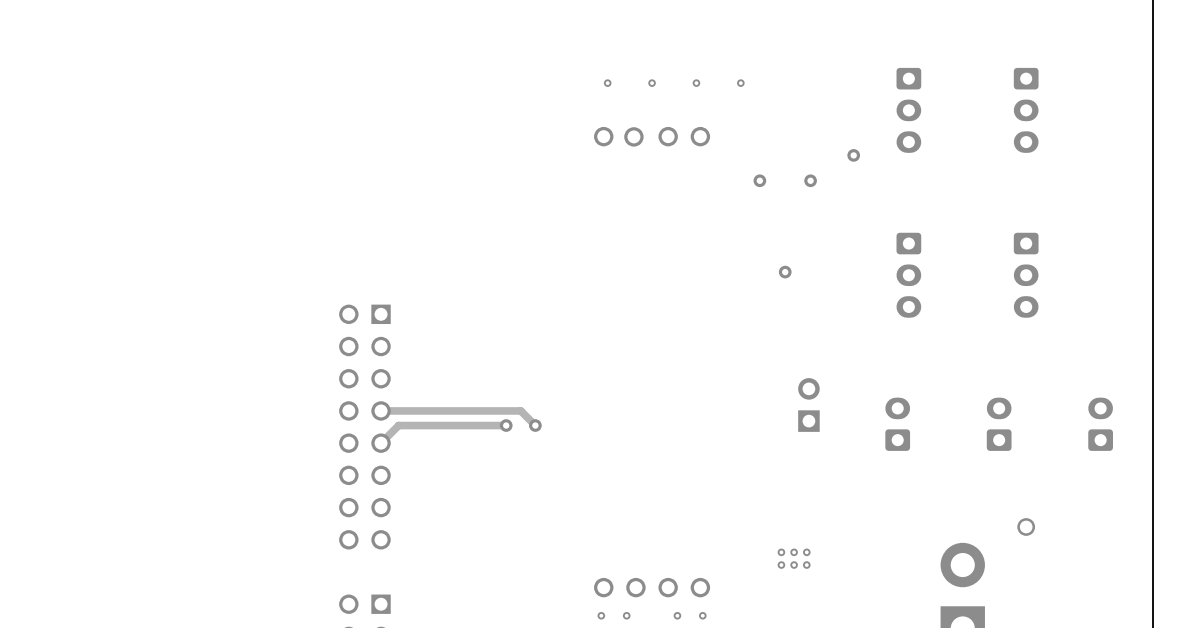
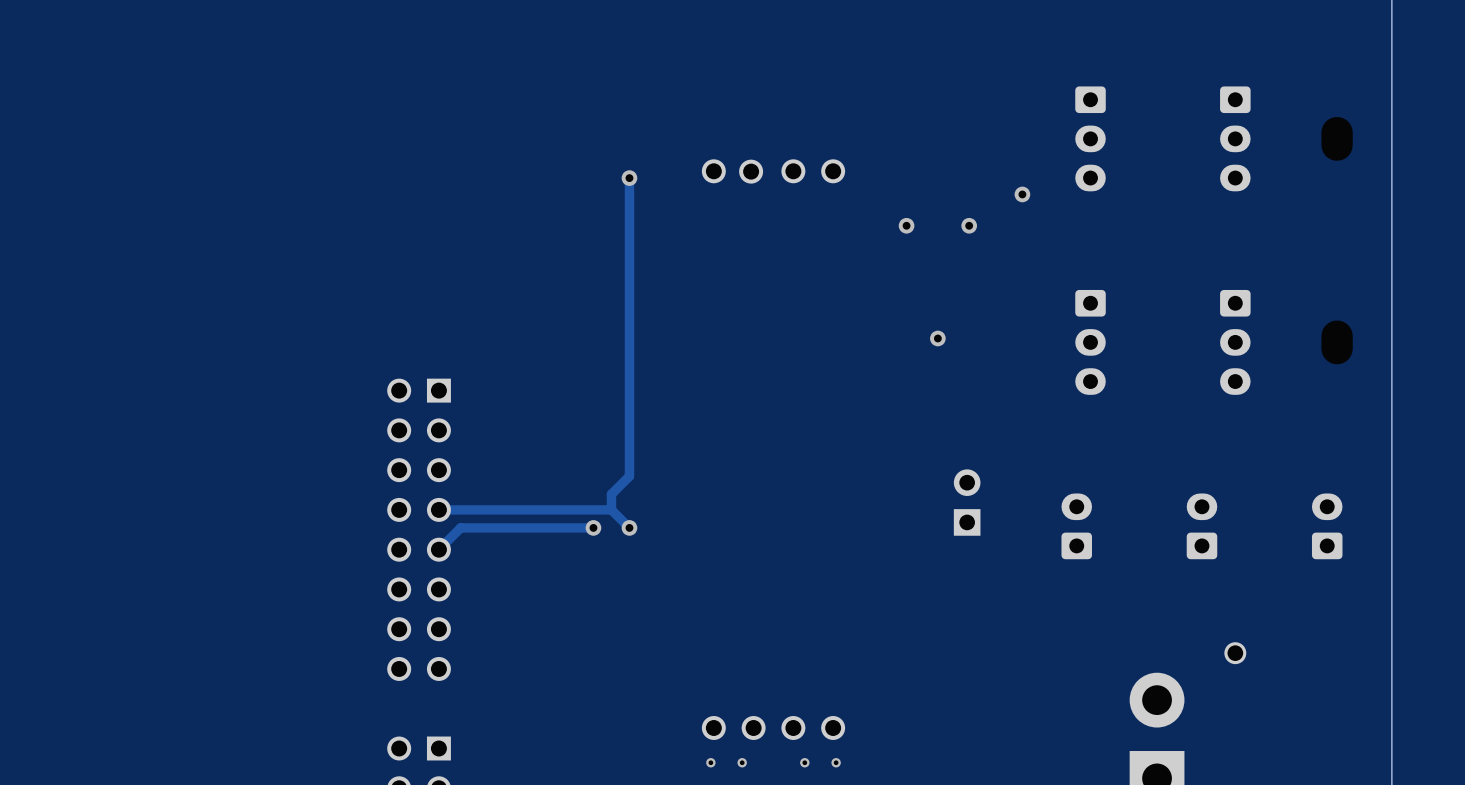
via: (607, 83) -> none
via: (652, 83) -> none
via: (696, 83) -> none
via: (740, 83) -> none
track: none -> (629, 178) (629, 476) (611, 494) (611, 509)
via: none -> (629, 178)
via: (781, 552) -> none
via: (794, 552) -> none
via: (806, 552) -> none
via: (781, 565) -> none
via: (794, 565) -> none
via: (806, 565) -> none

